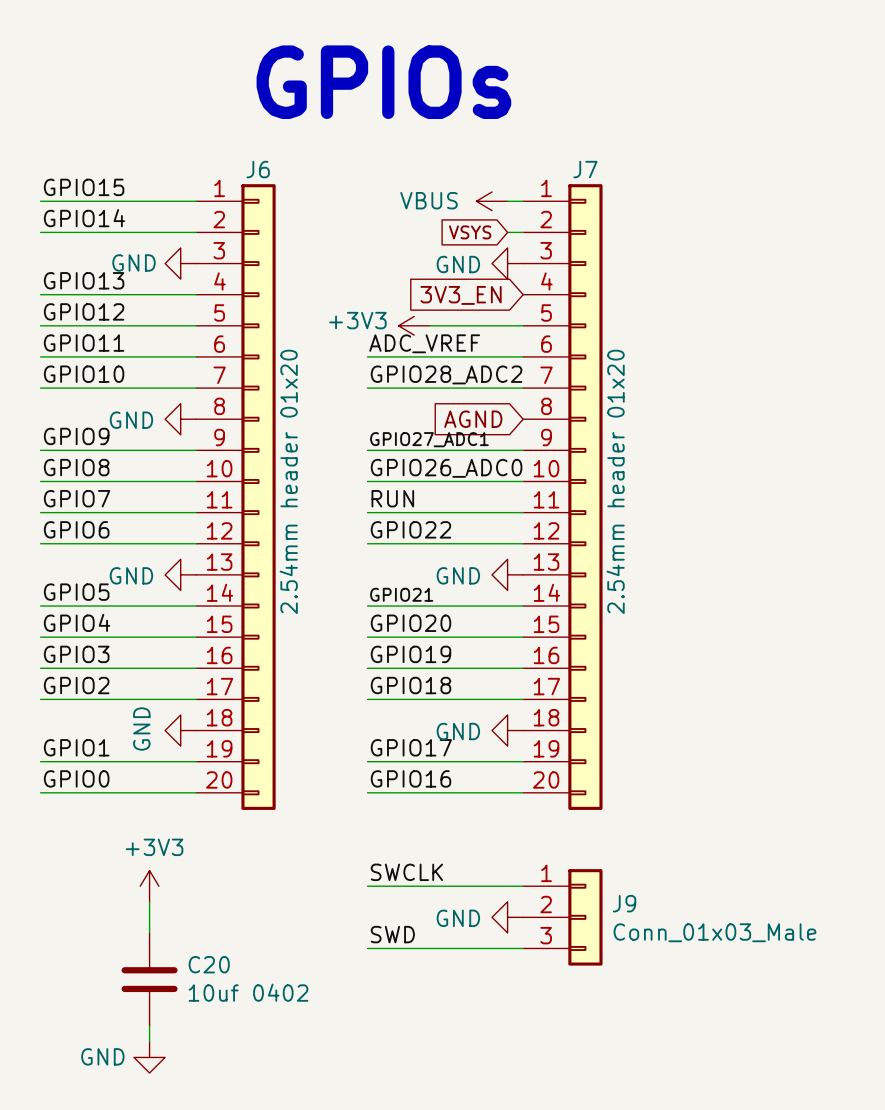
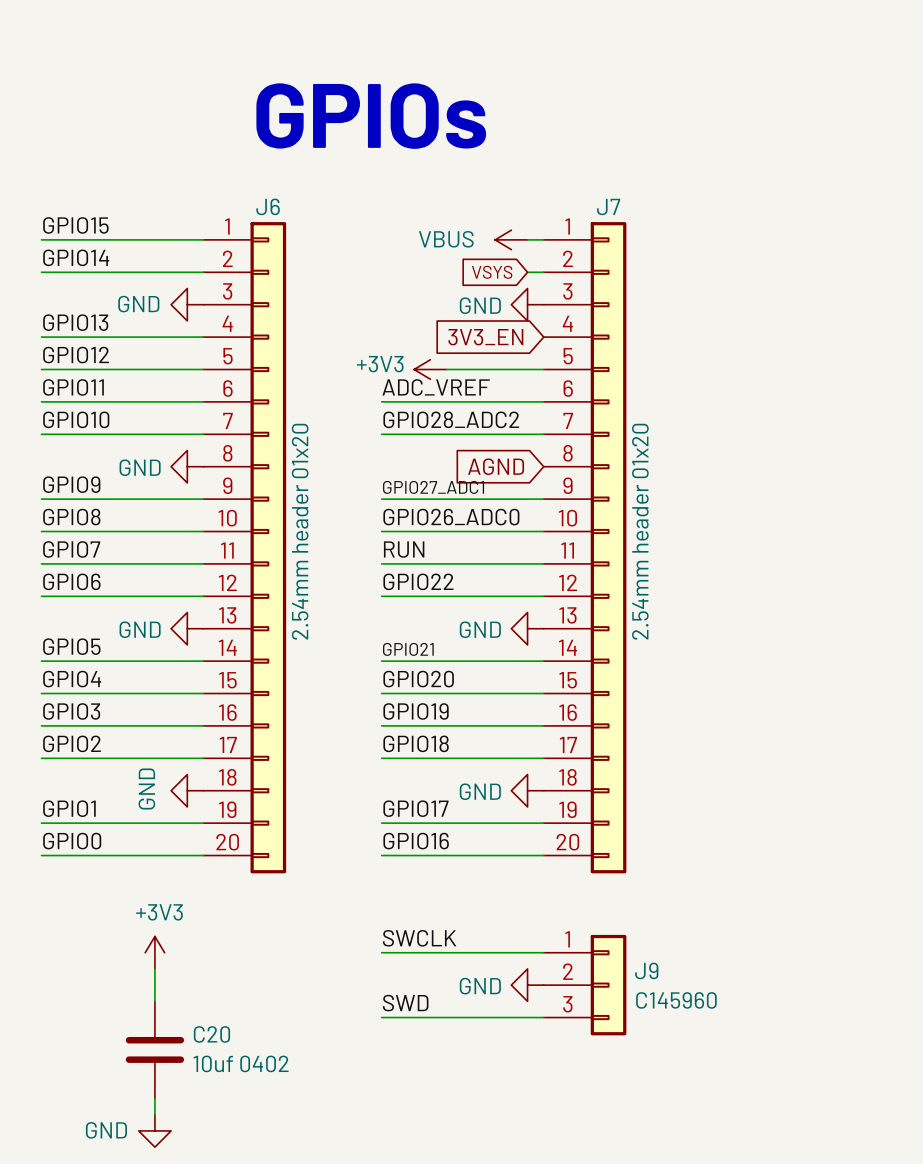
J9 value: Conn_01x03_Male (714, 932) -> C145960 (676, 1000)

